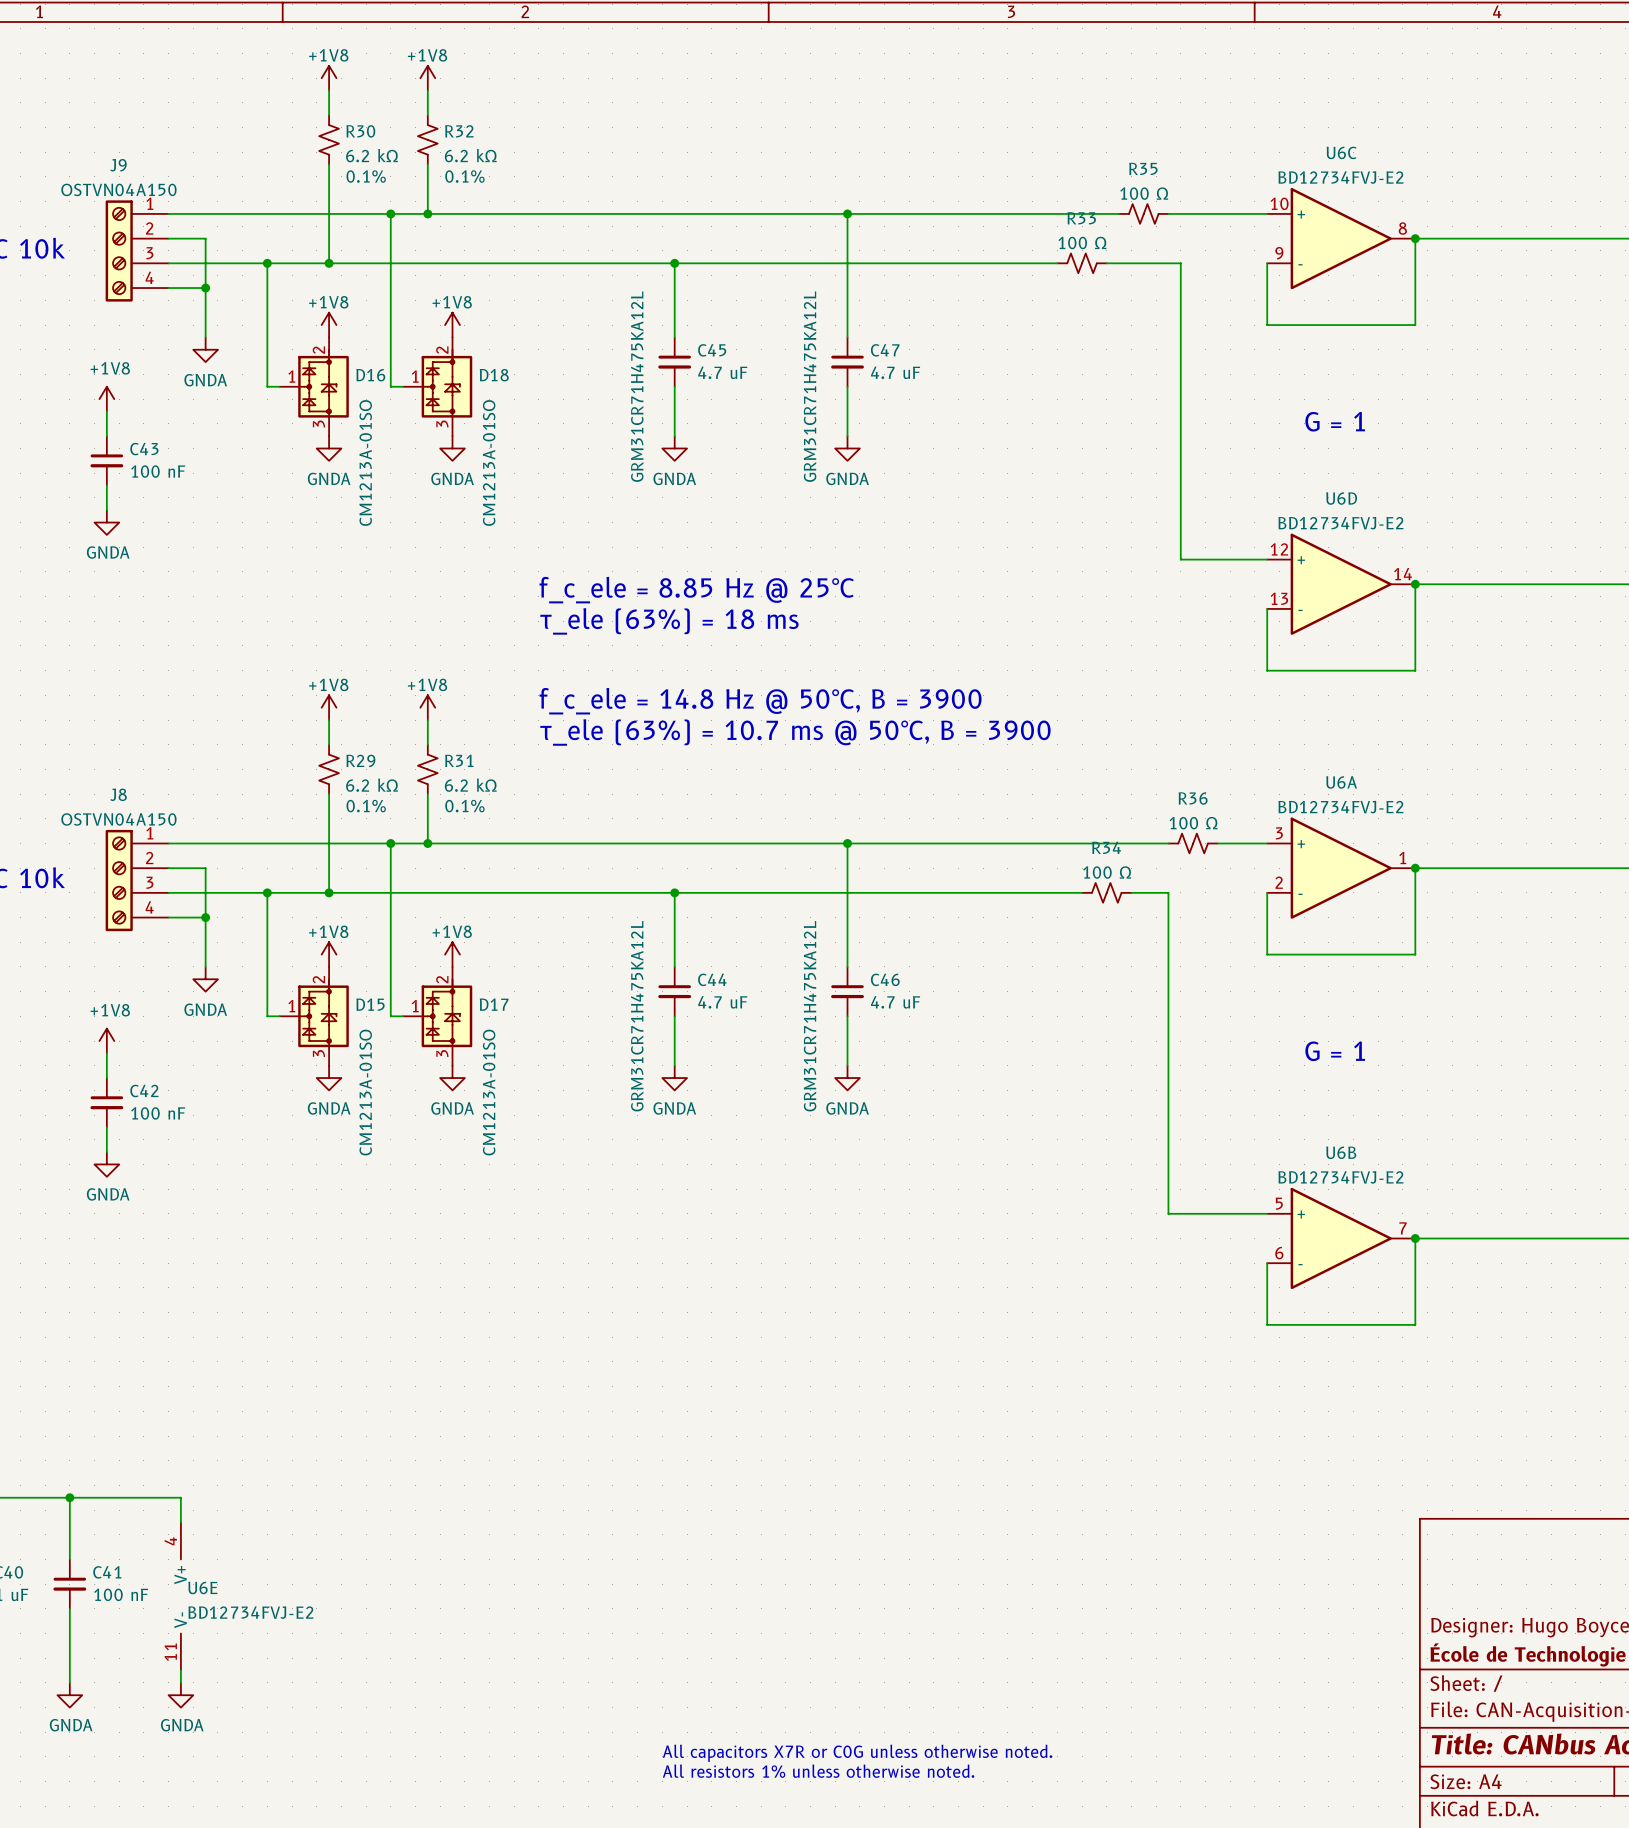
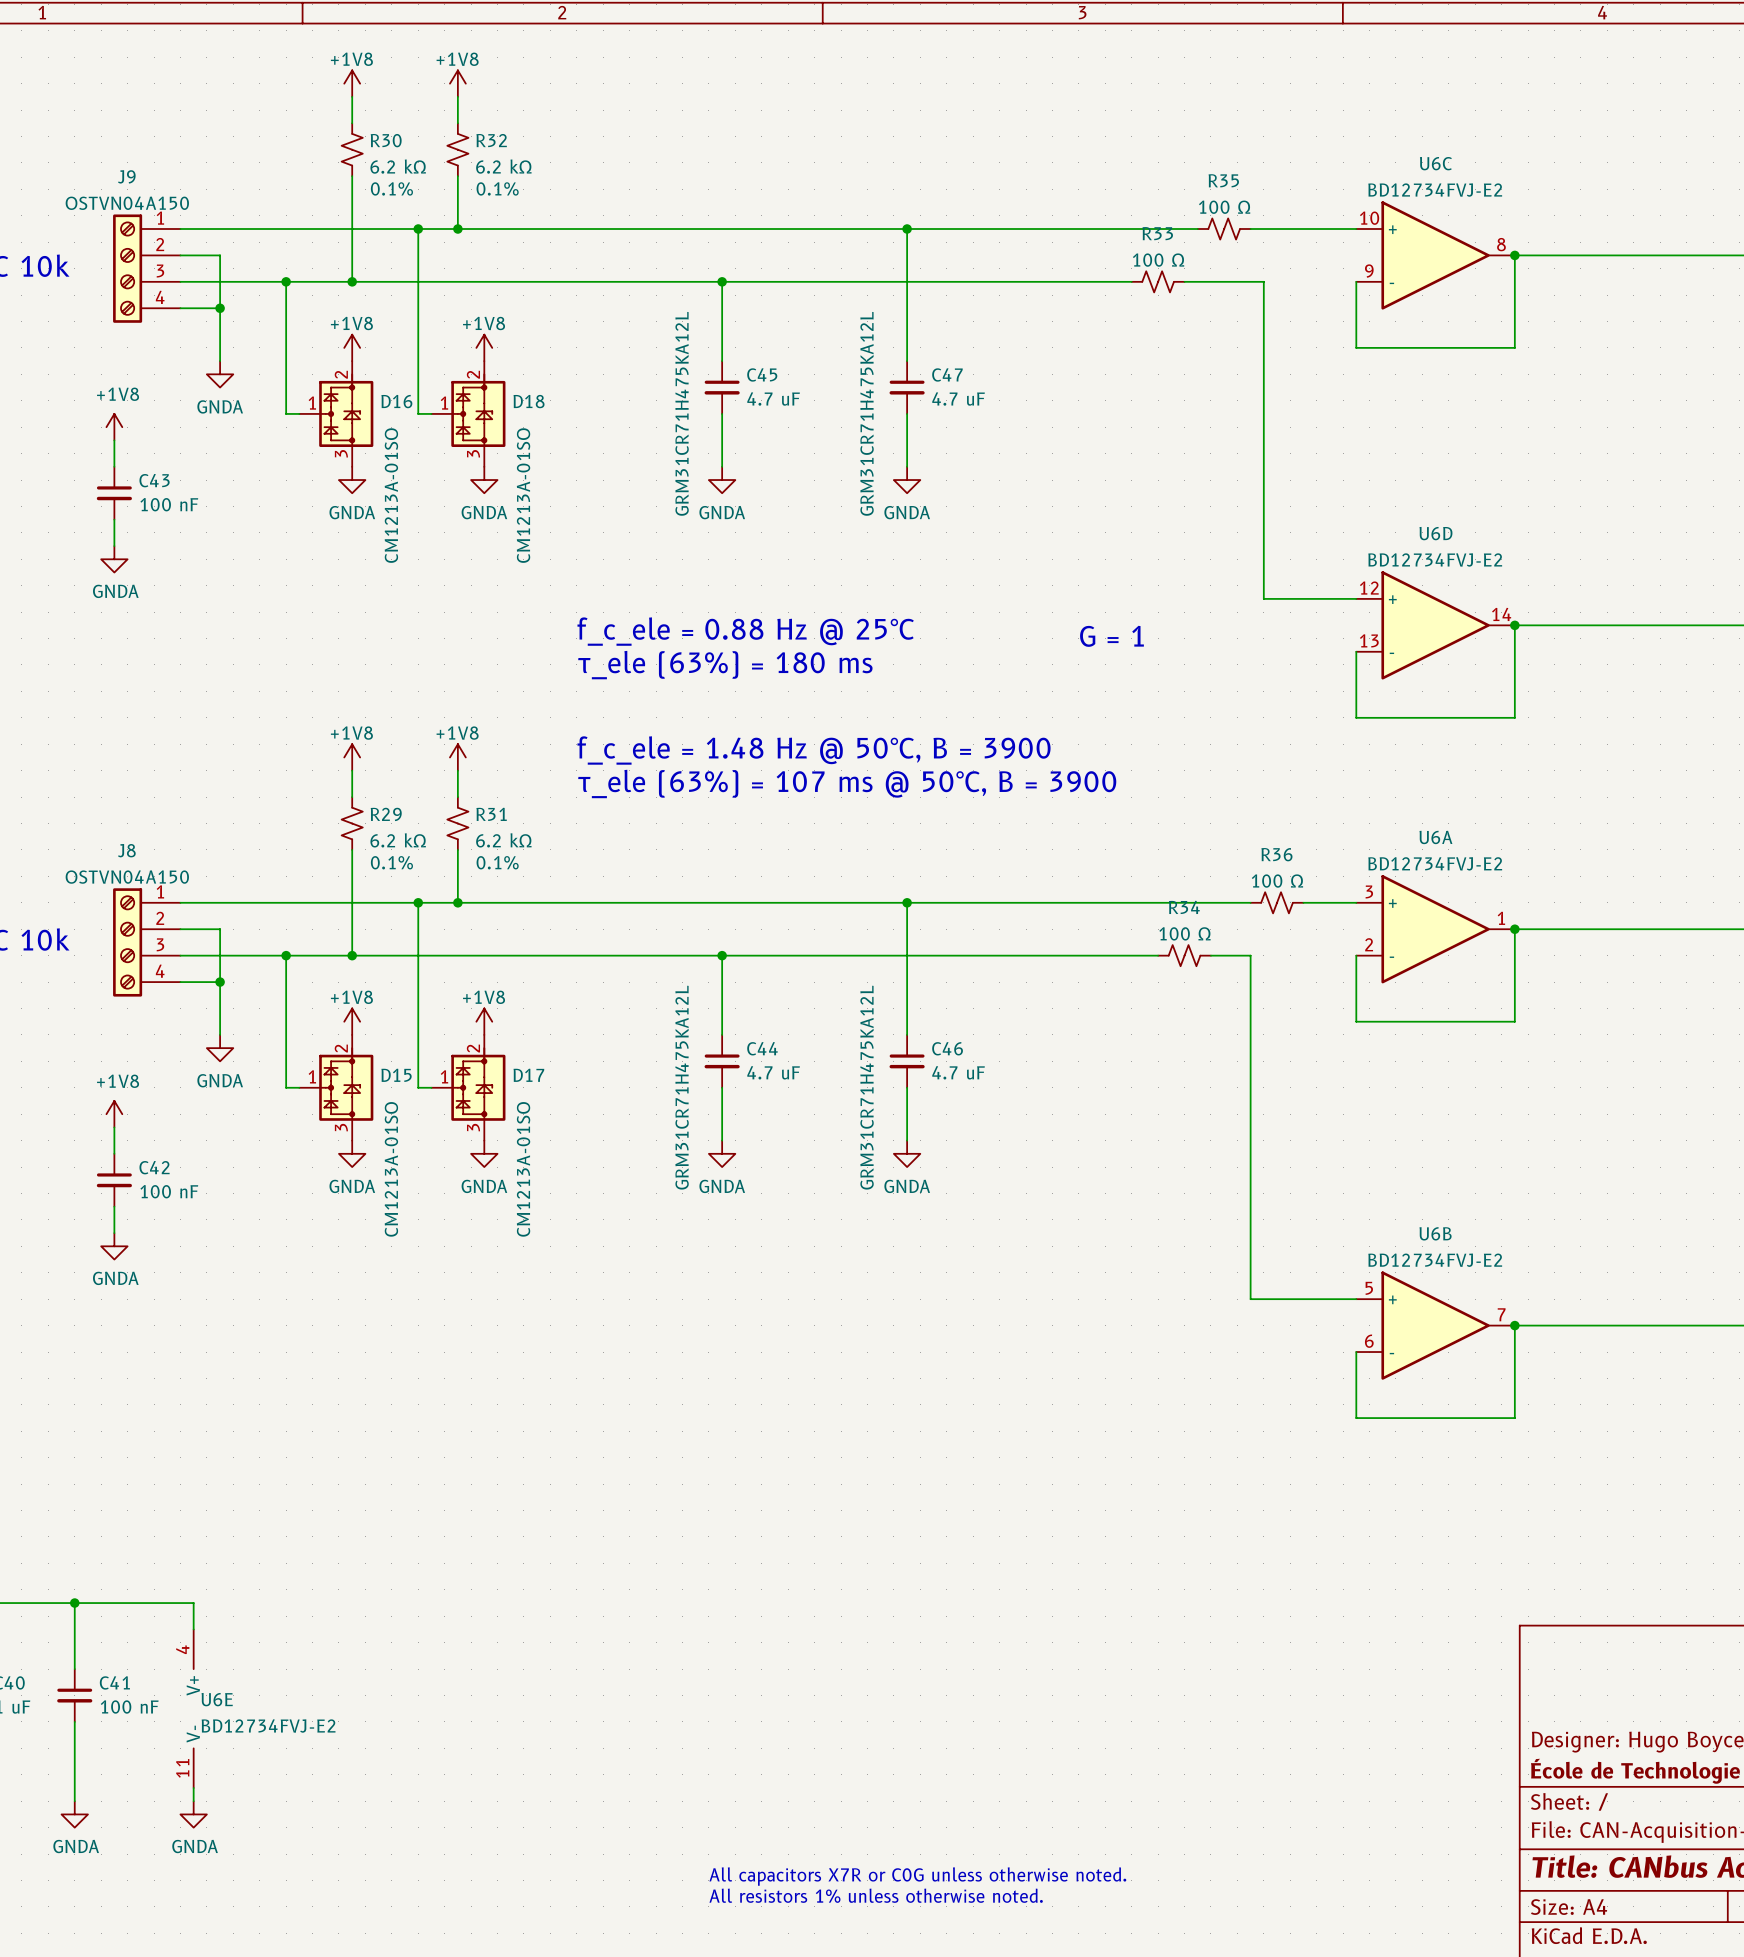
text: G = 1 (1335, 421) -> none
text: f_c_ele = 8.85 Hz @ 25°C (696, 590) -> f_c_ele = 0.88 Hz @ 25°C (745, 631)
text: none -> G = 1 (1111, 636)
text: τ_ele (63%) = 18 ms (669, 621) -> τ_ele (63%) = 180 ms (725, 665)
text: f_c_ele = 14.8 Hz @ 50°C, B = 3900 (760, 701) -> f_c_ele = 1.48 Hz @ 50°C, B = 3900 (814, 750)
text: τ_ele (63%) = 10.7 ms @ 50°C, B = 3900 (795, 732) -> τ_ele (63%) = 107 ms @ 50°C, B = 3900 (847, 783)
text: G = 1 (1335, 1051) -> none

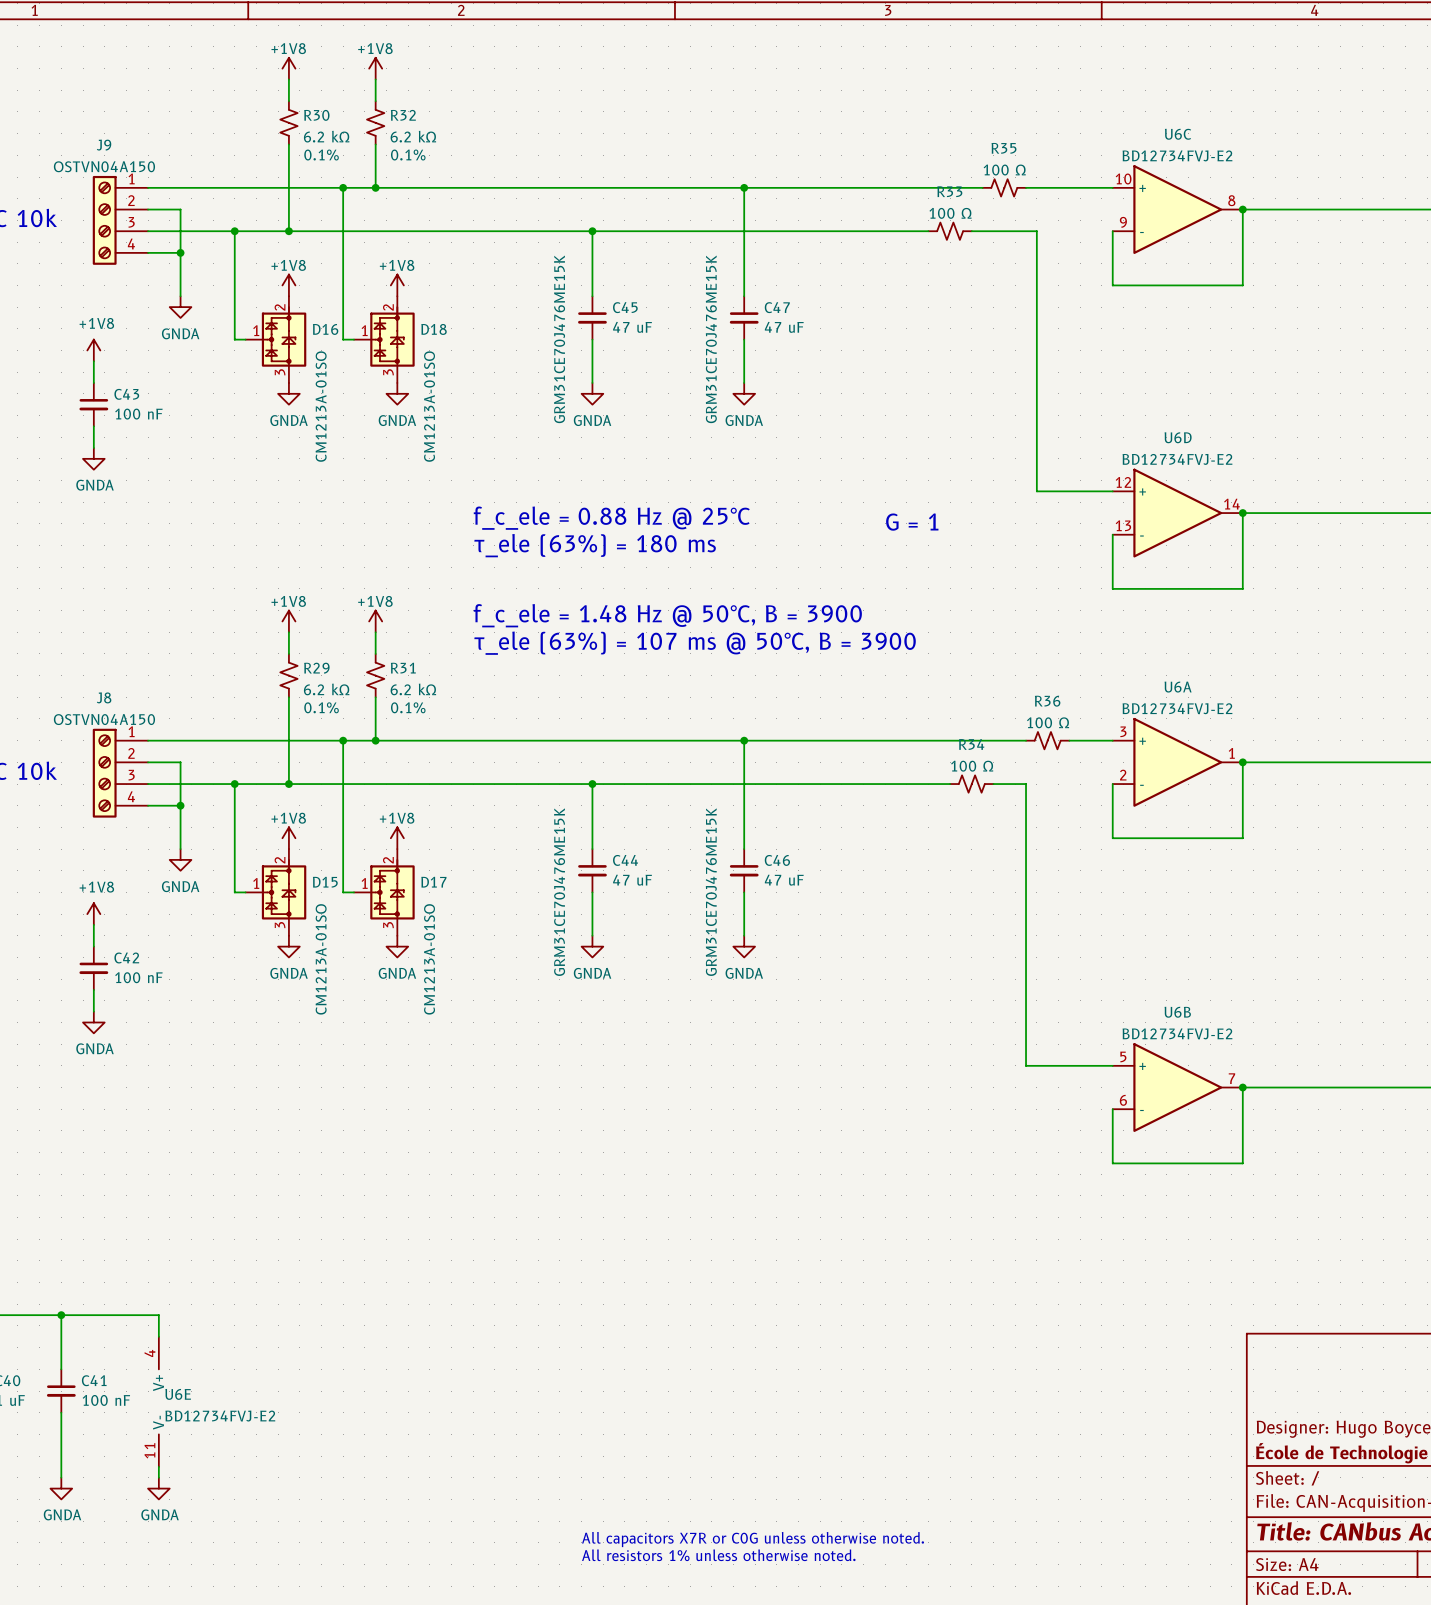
C45 value: 4.7 uF (773, 399) -> 47 uF (632, 327)
C47 value: 4.7 uF (958, 399) -> 47 uF (784, 327)
C45 text: GRM31CR71H475KA12L (682, 413) -> GRM31CE70J476ME15K (559, 339)
C47 text: GRM31CR71H475KA12L (867, 413) -> GRM31CE70J476ME15K (711, 339)
C44 value: 4.7 uF (773, 1072) -> 47 uF (632, 880)
C46 value: 4.7 uF (958, 1072) -> 47 uF (784, 880)
C44 text: GRM31CR71H475KA12L (682, 1087) -> GRM31CE70J476ME15K (559, 892)
C46 text: GRM31CR71H475KA12L (867, 1087) -> GRM31CE70J476ME15K (711, 892)

